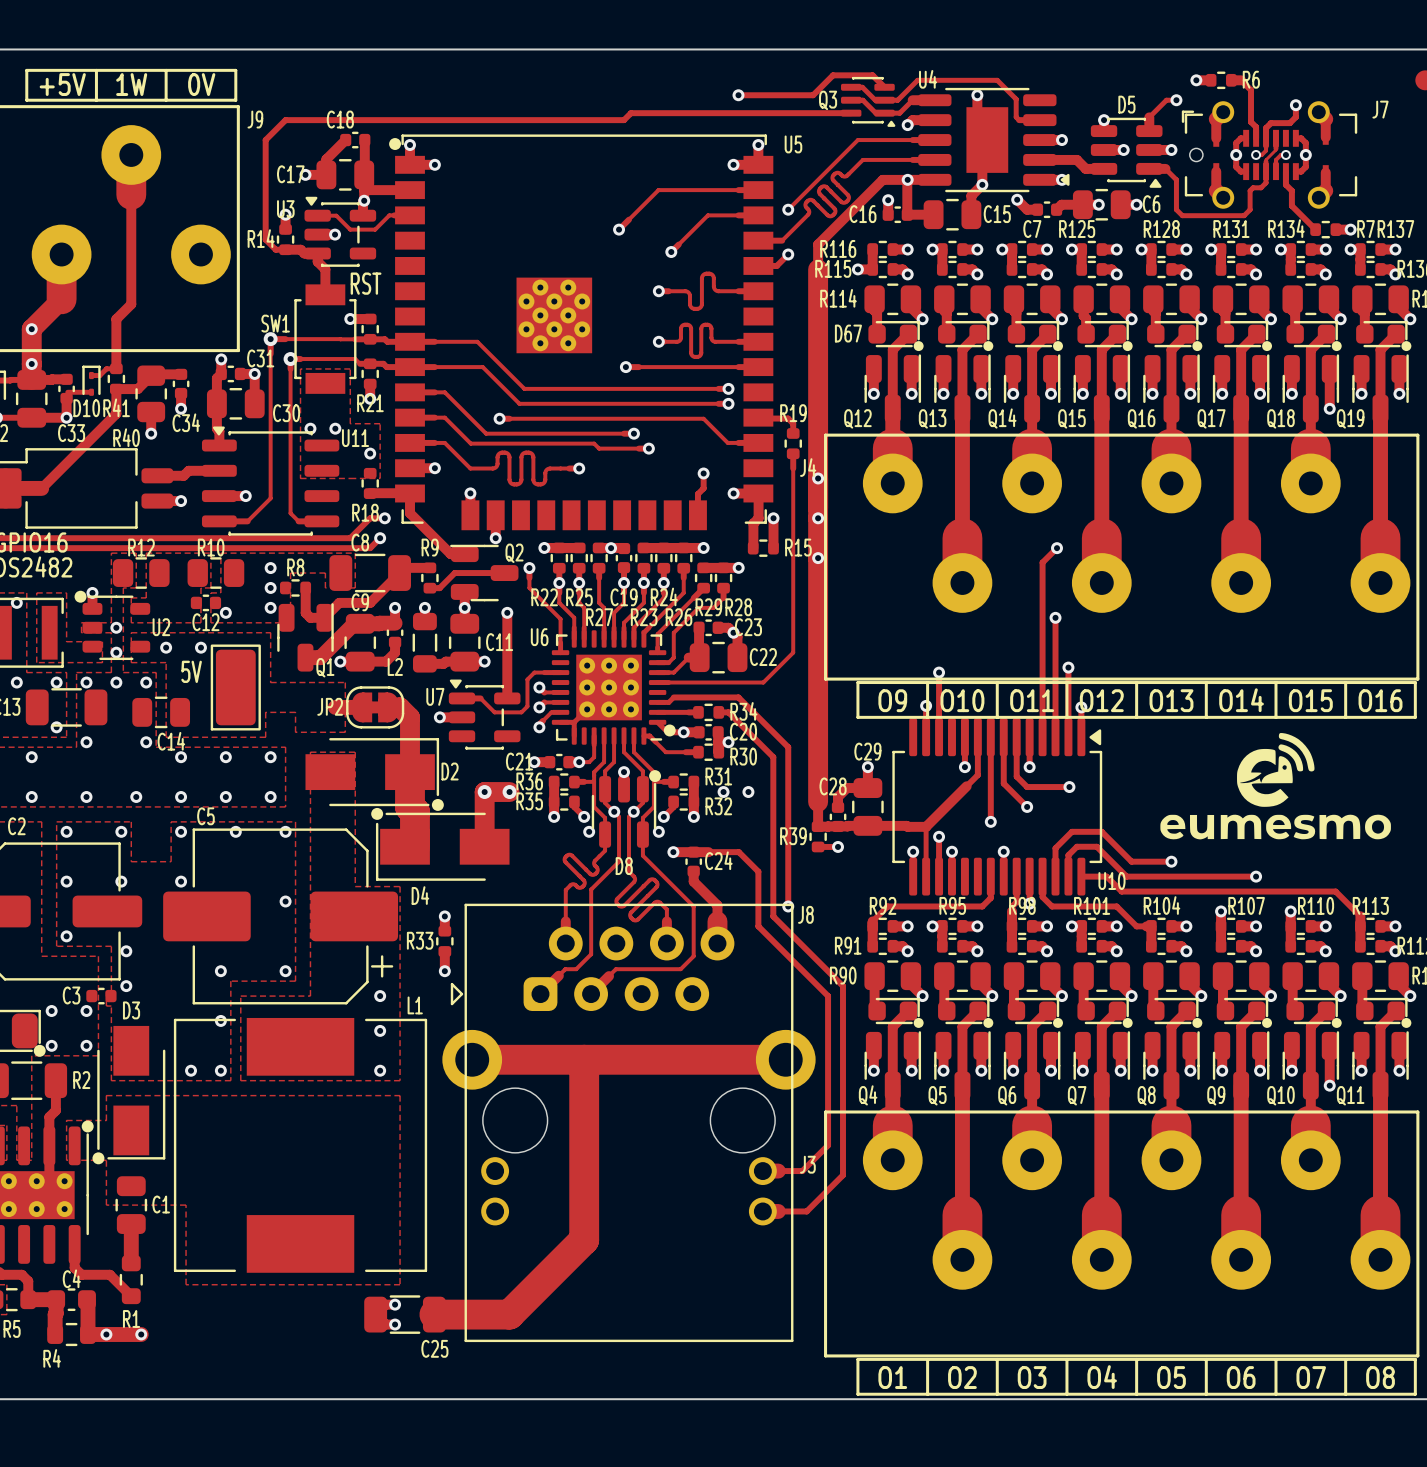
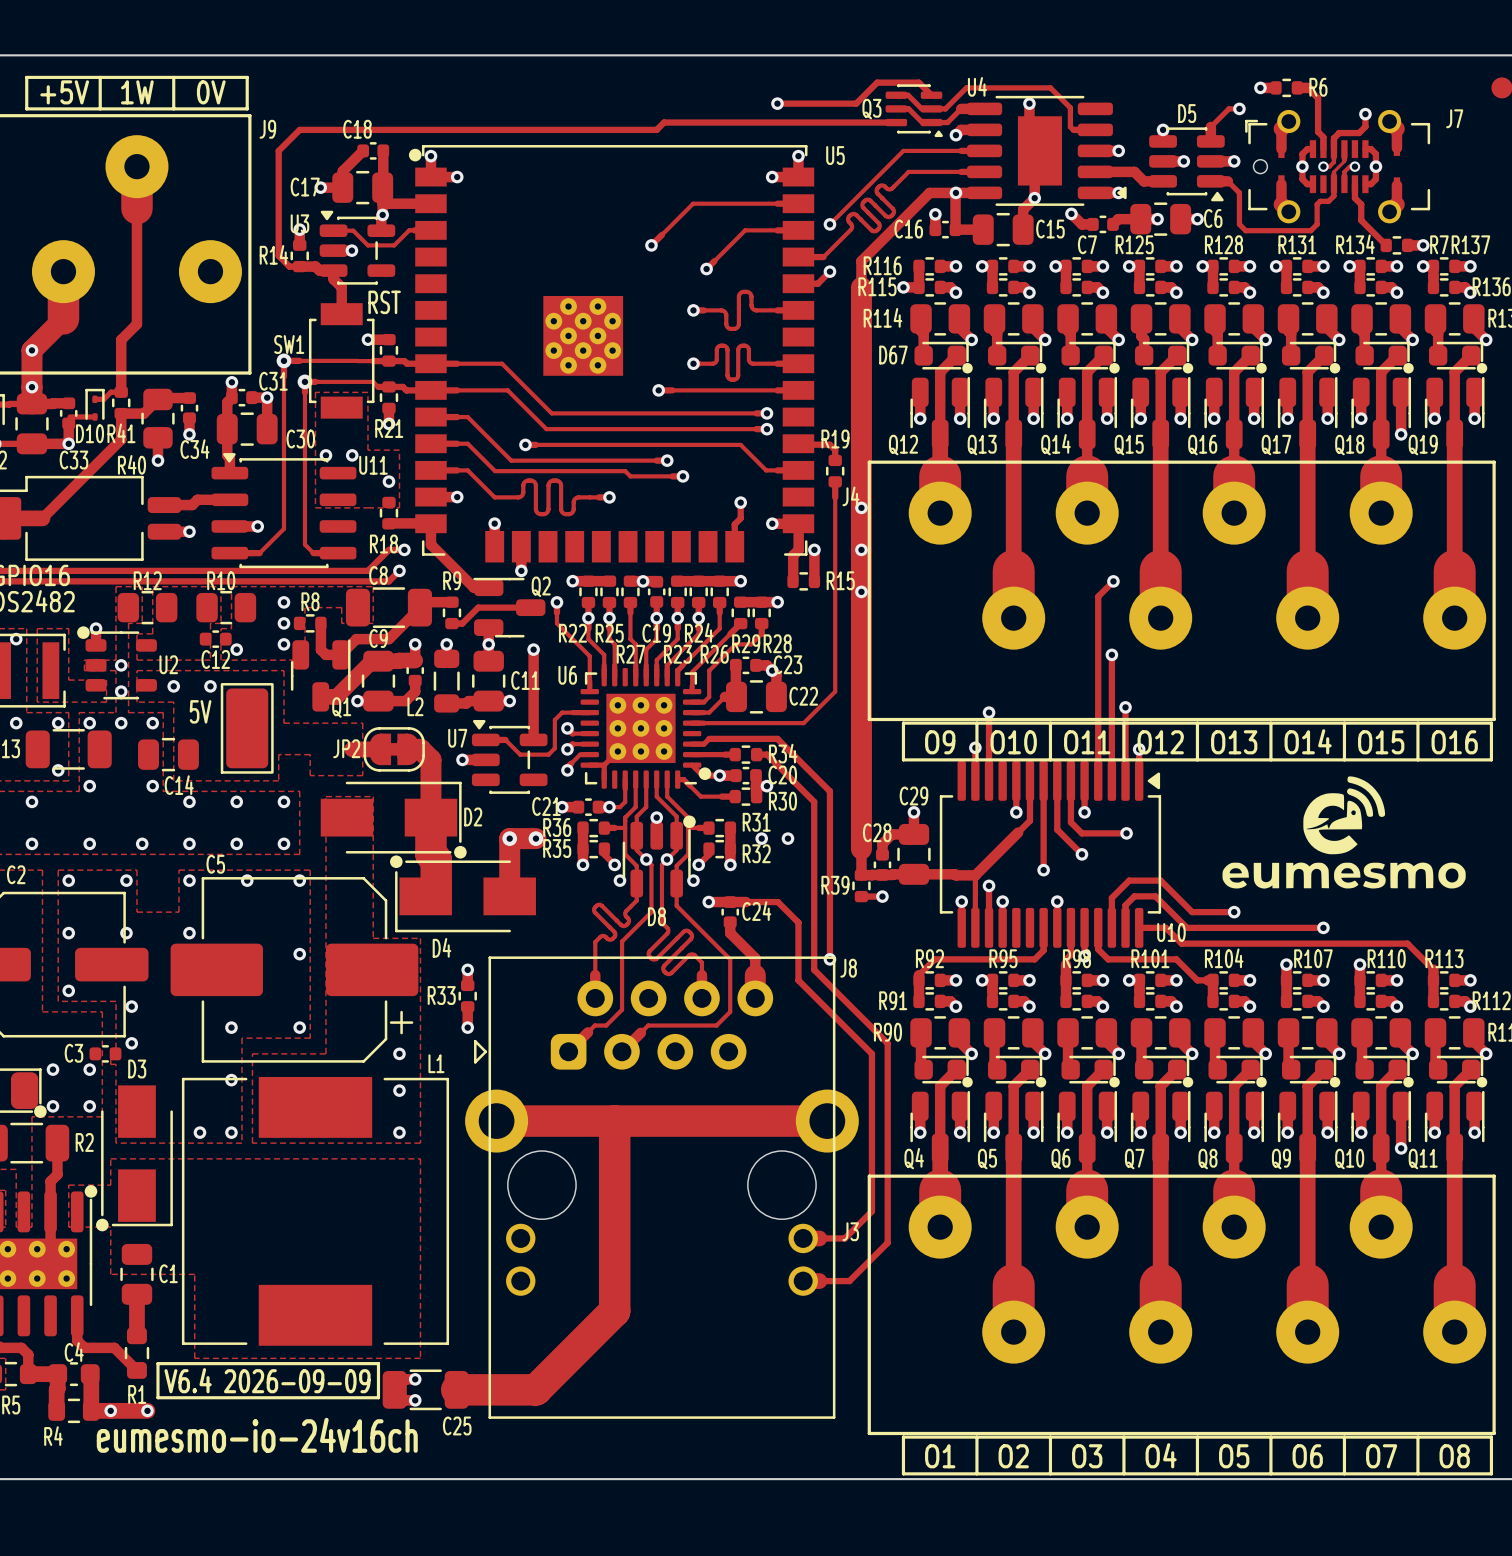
line: none -> (157, 1363) (378, 1363) (378, 1397) (157, 1397) (157, 1363)
text: none -> V6.4 2026-09-09 (267, 1380)
text: none -> eumesmo-io-24v16ch (257, 1435)

